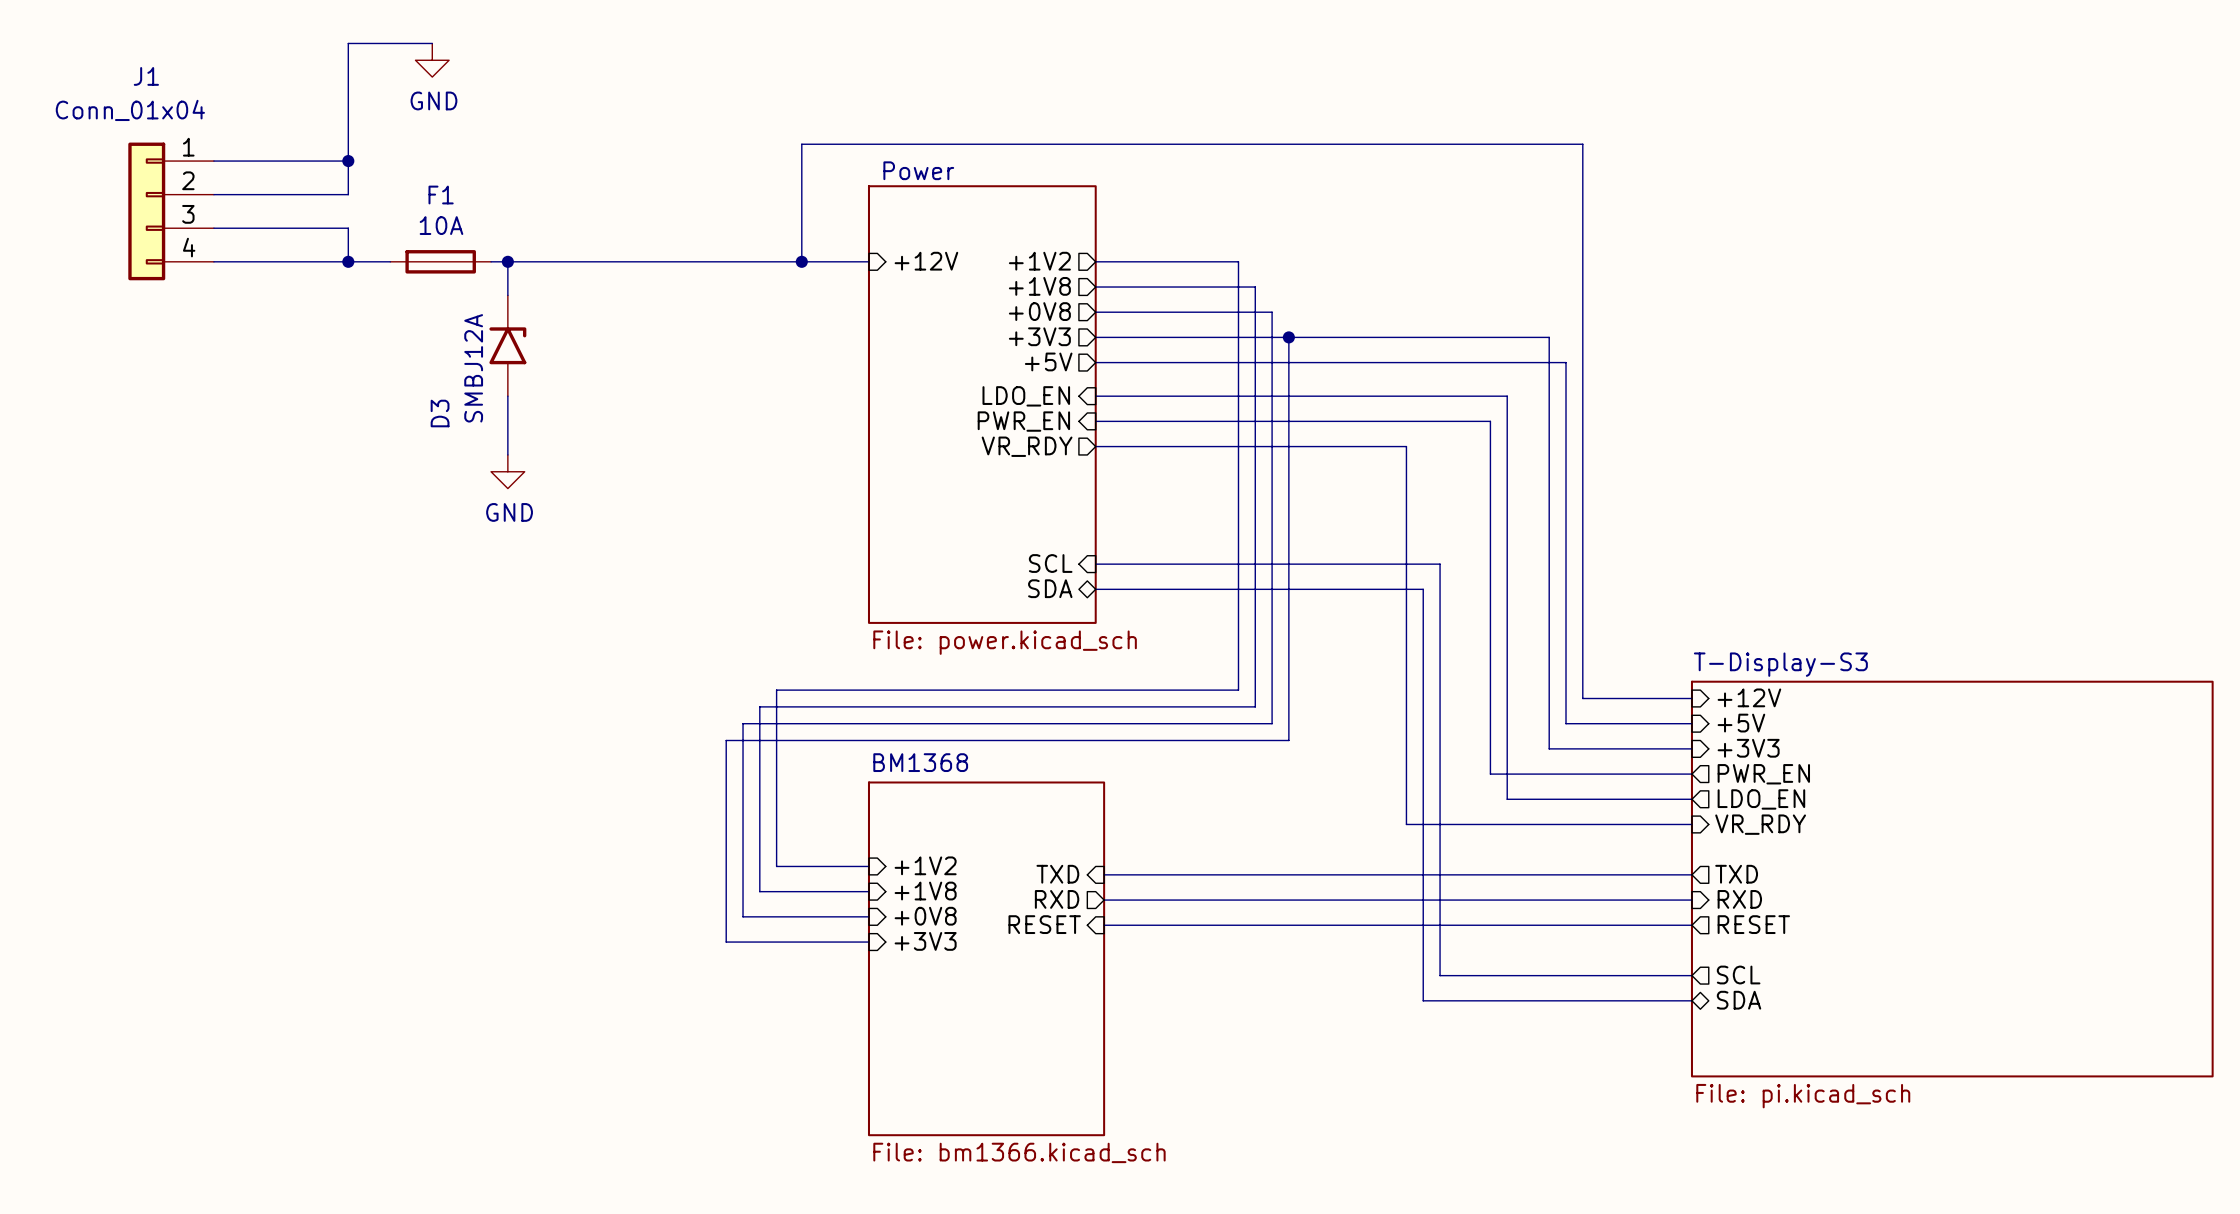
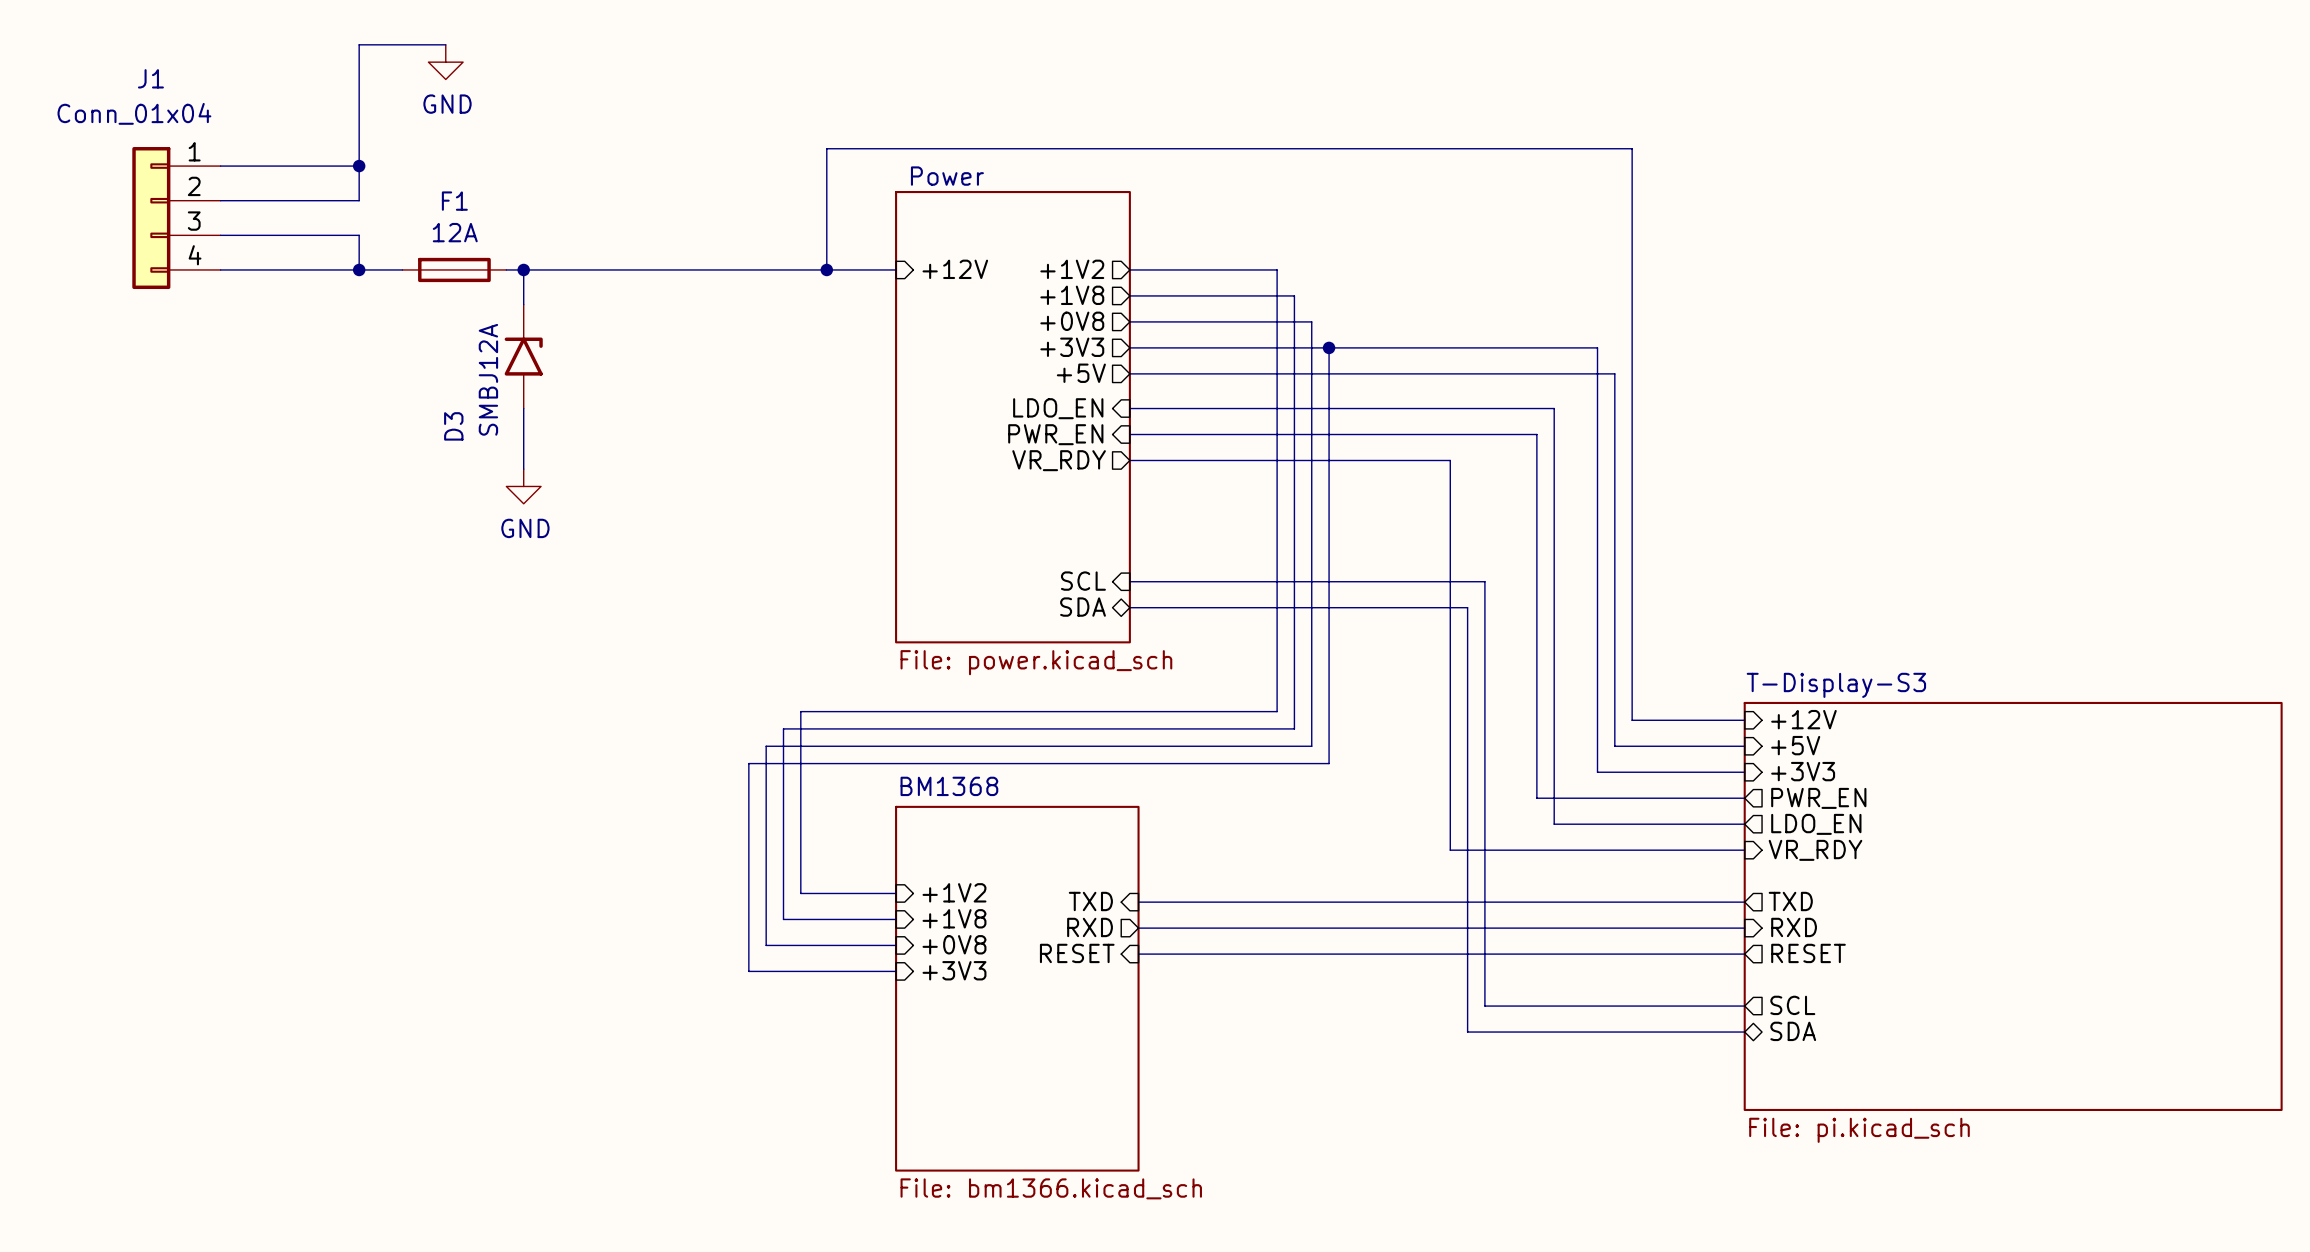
F1 value: 10A (441, 225) -> 12A (455, 232)

